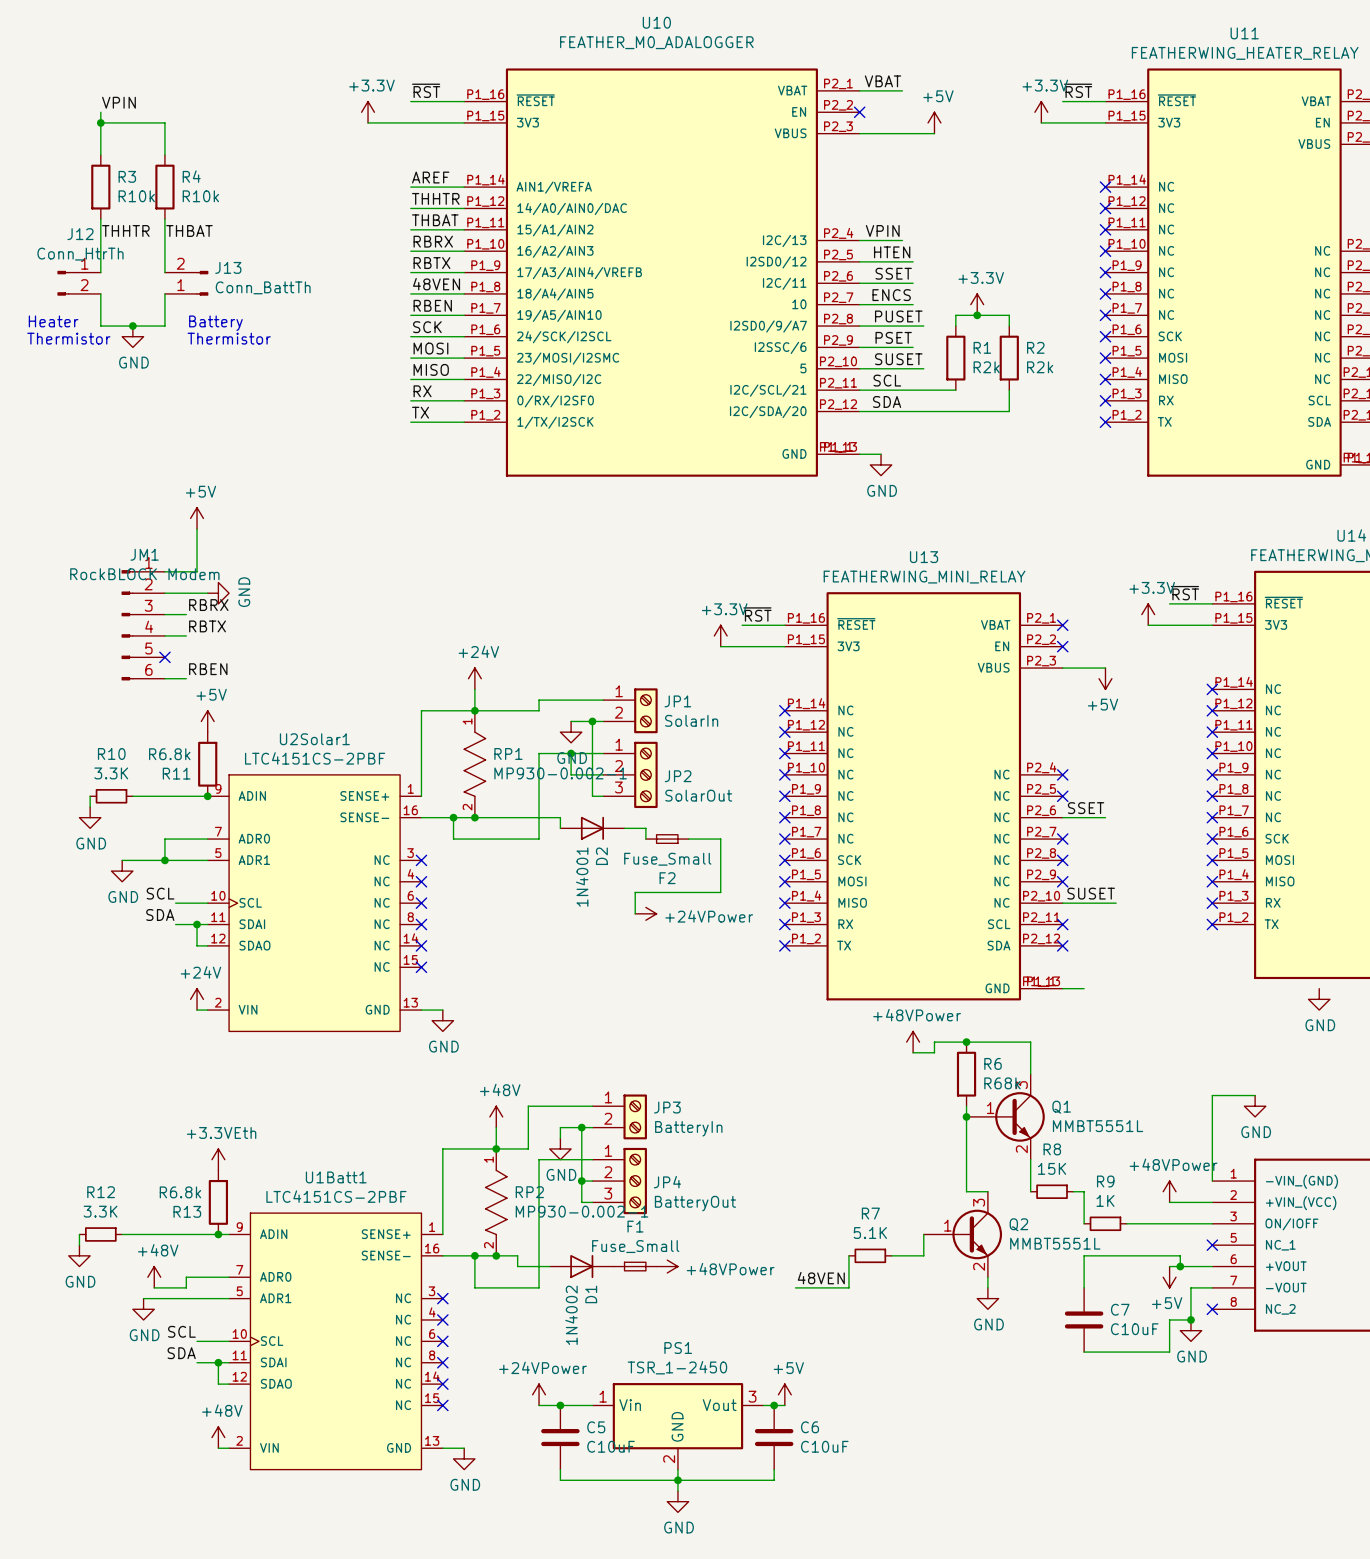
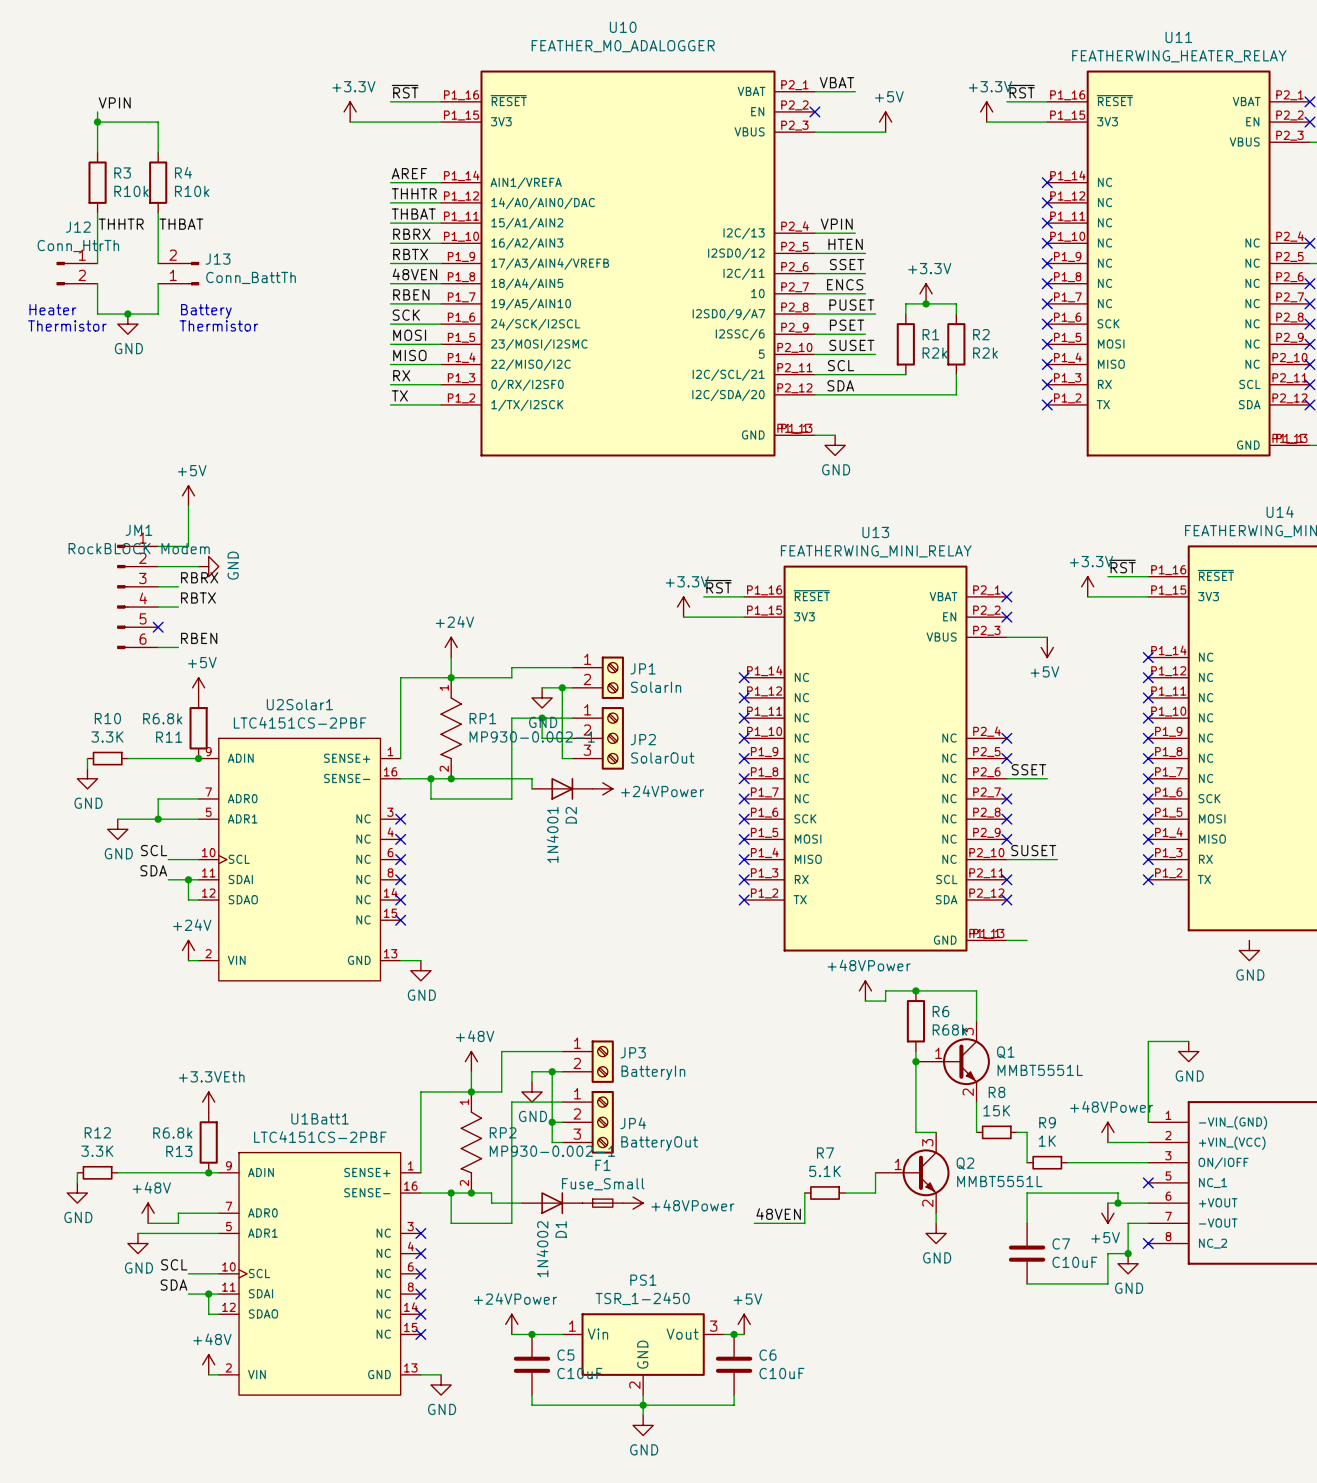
F2: Fuse_Small (667, 839) -> none
wire: (688, 839) (720, 839) (720, 892) (635, 892) (635, 913) -> none
power symbol position: +24VPower (645, 913) -> +24VPower (602, 788)

